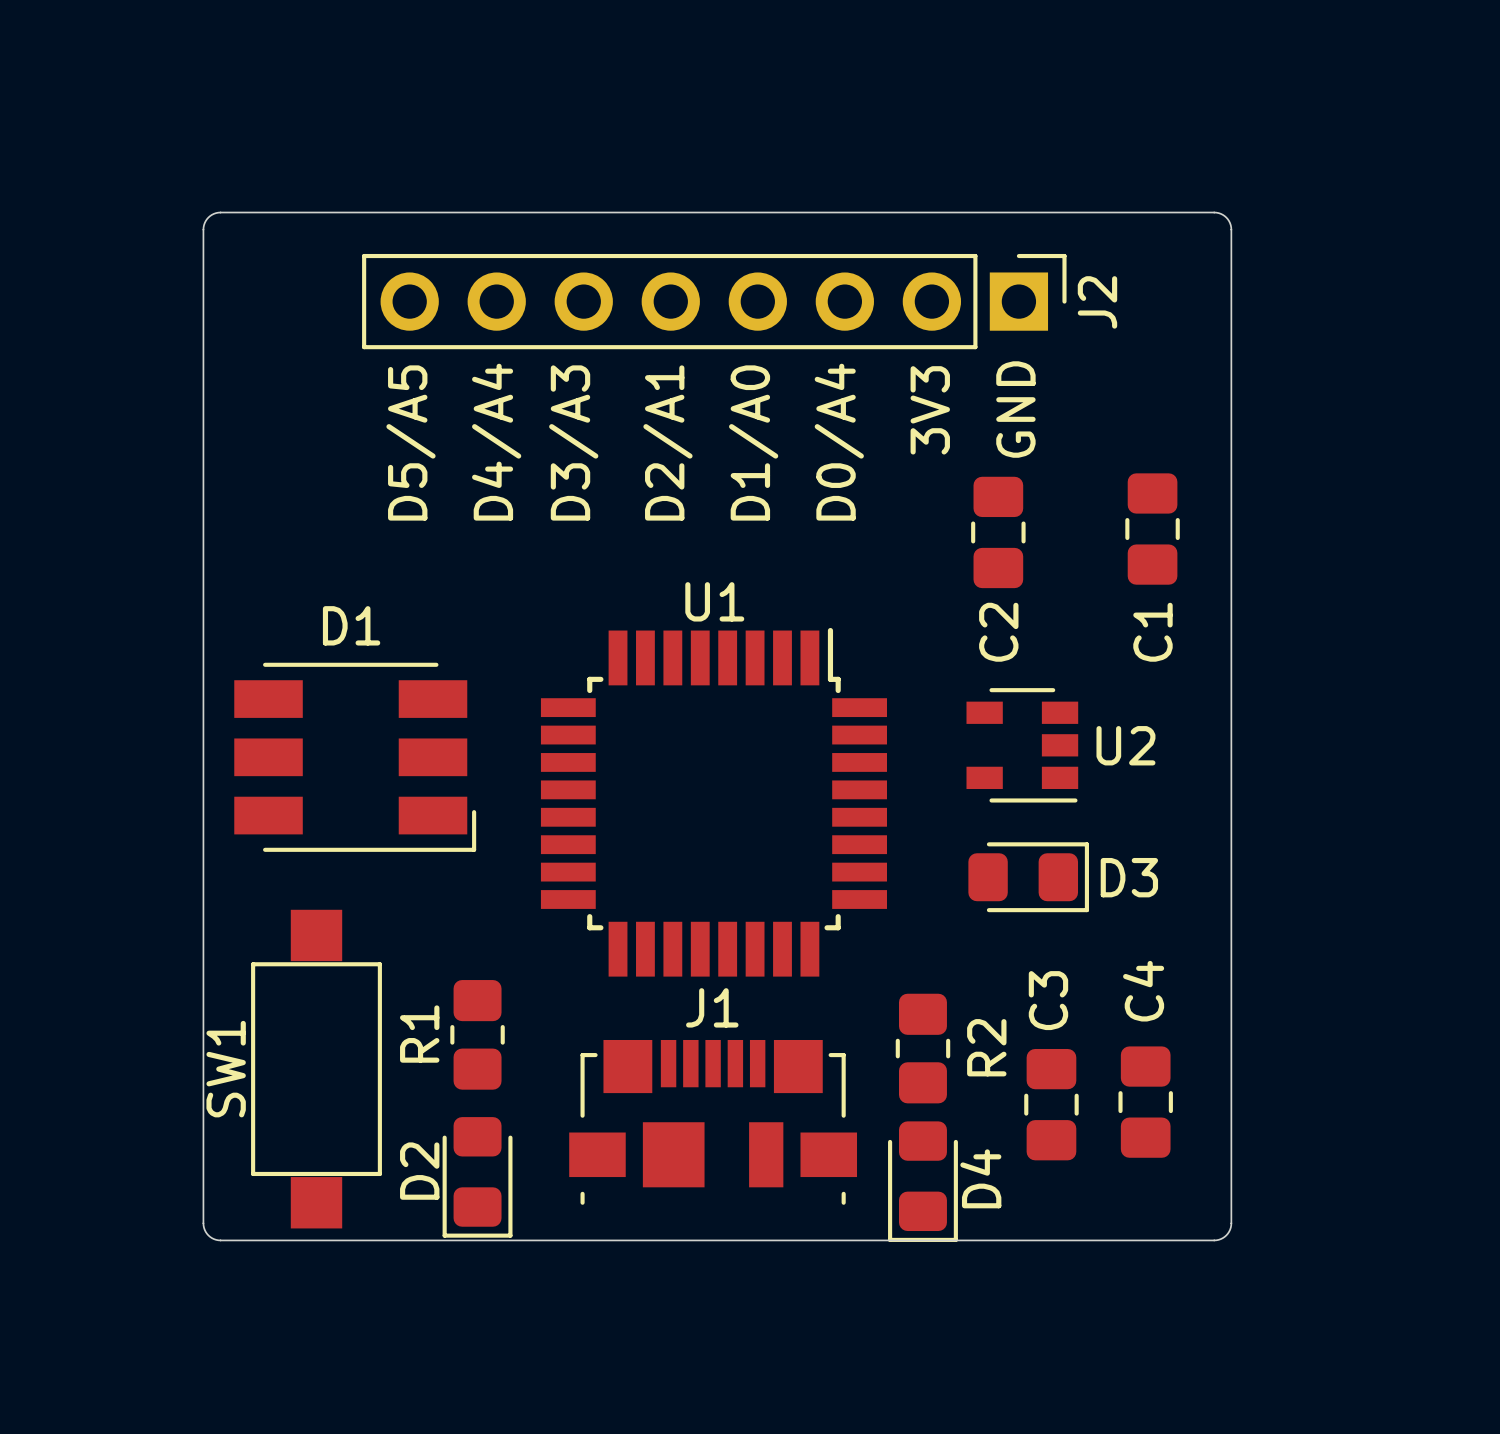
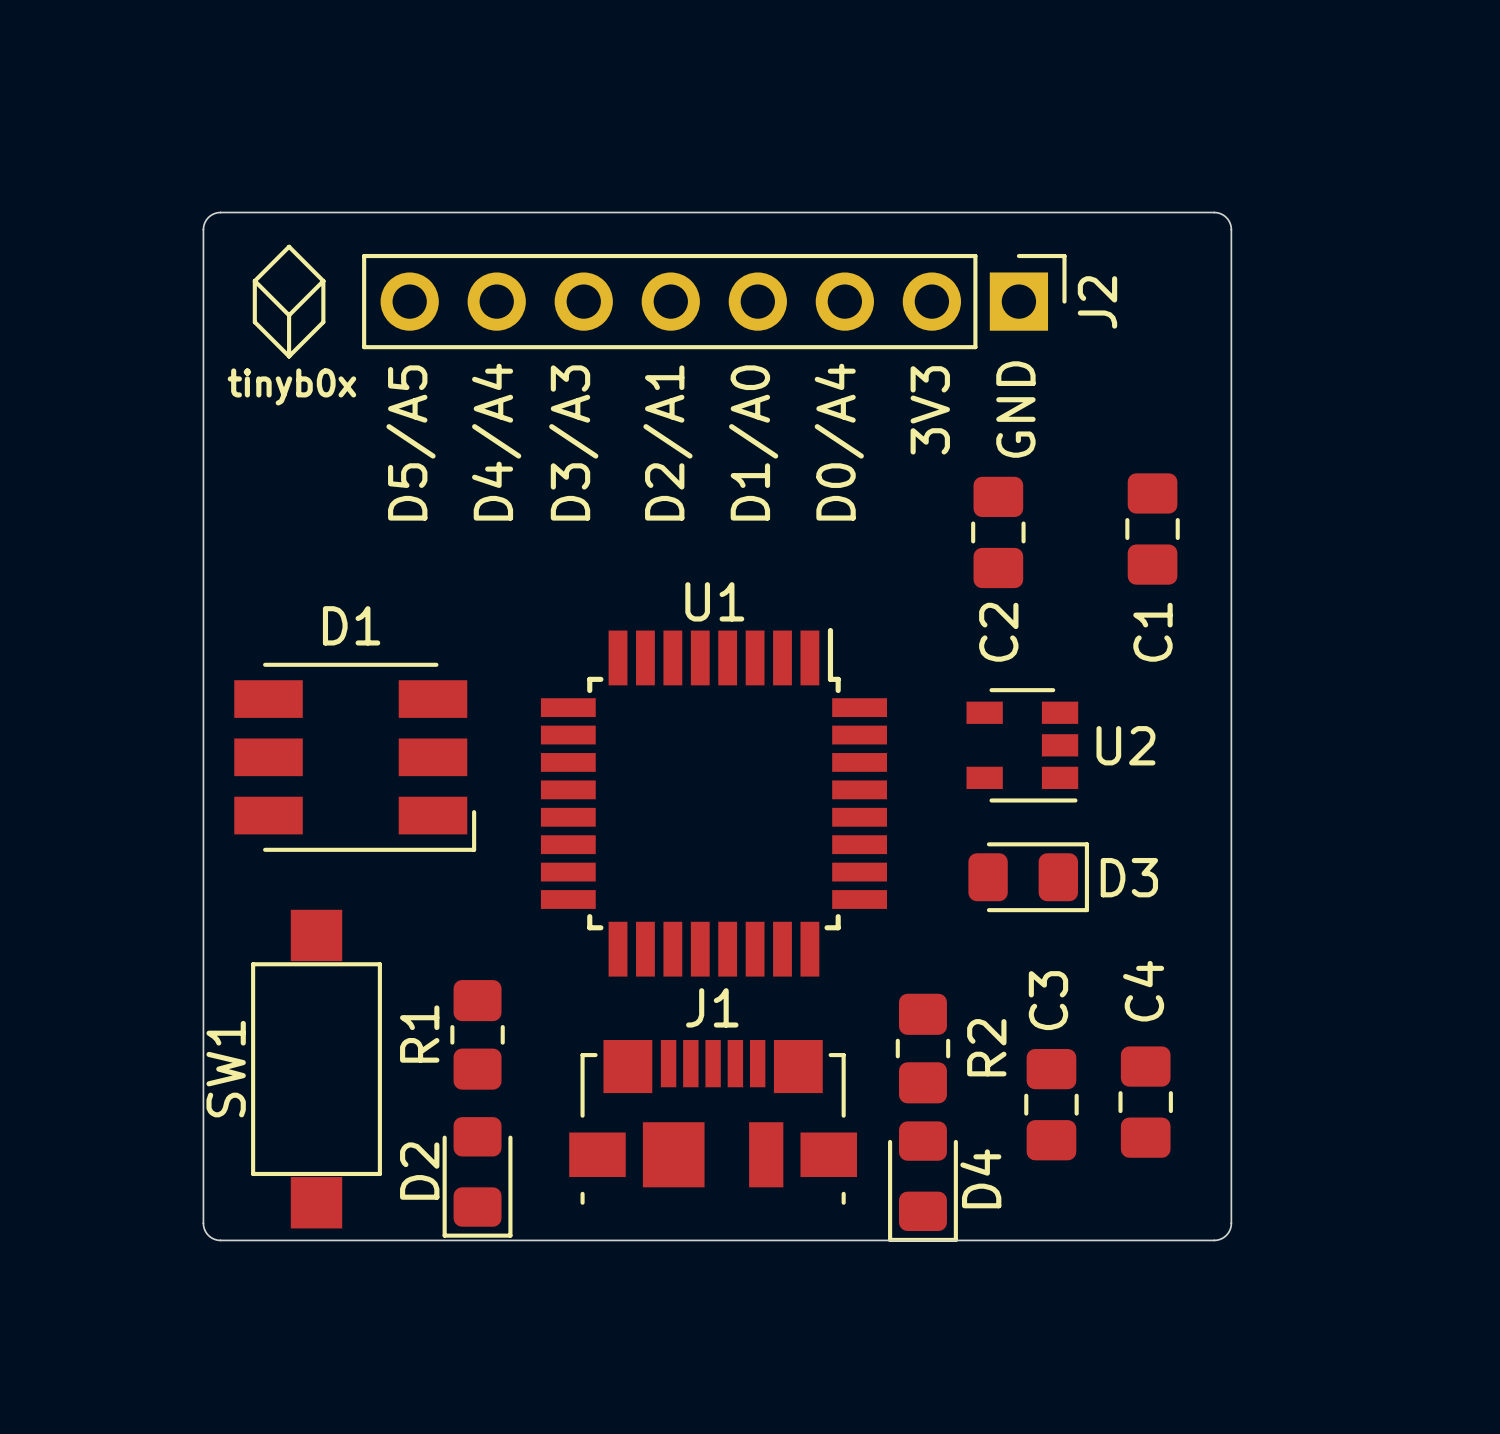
line: none -> (254, 281) (289, 315)
line: none -> (254, 281) (289, 246) (323, 281)
line: none -> (254, 281) (254, 322) (289, 356)
line: none -> (323, 281) (289, 315)
line: none -> (323, 281) (323, 322) (289, 356)
line: none -> (289, 315) (289, 356)
text: none -> tinyb0x (291, 386)

